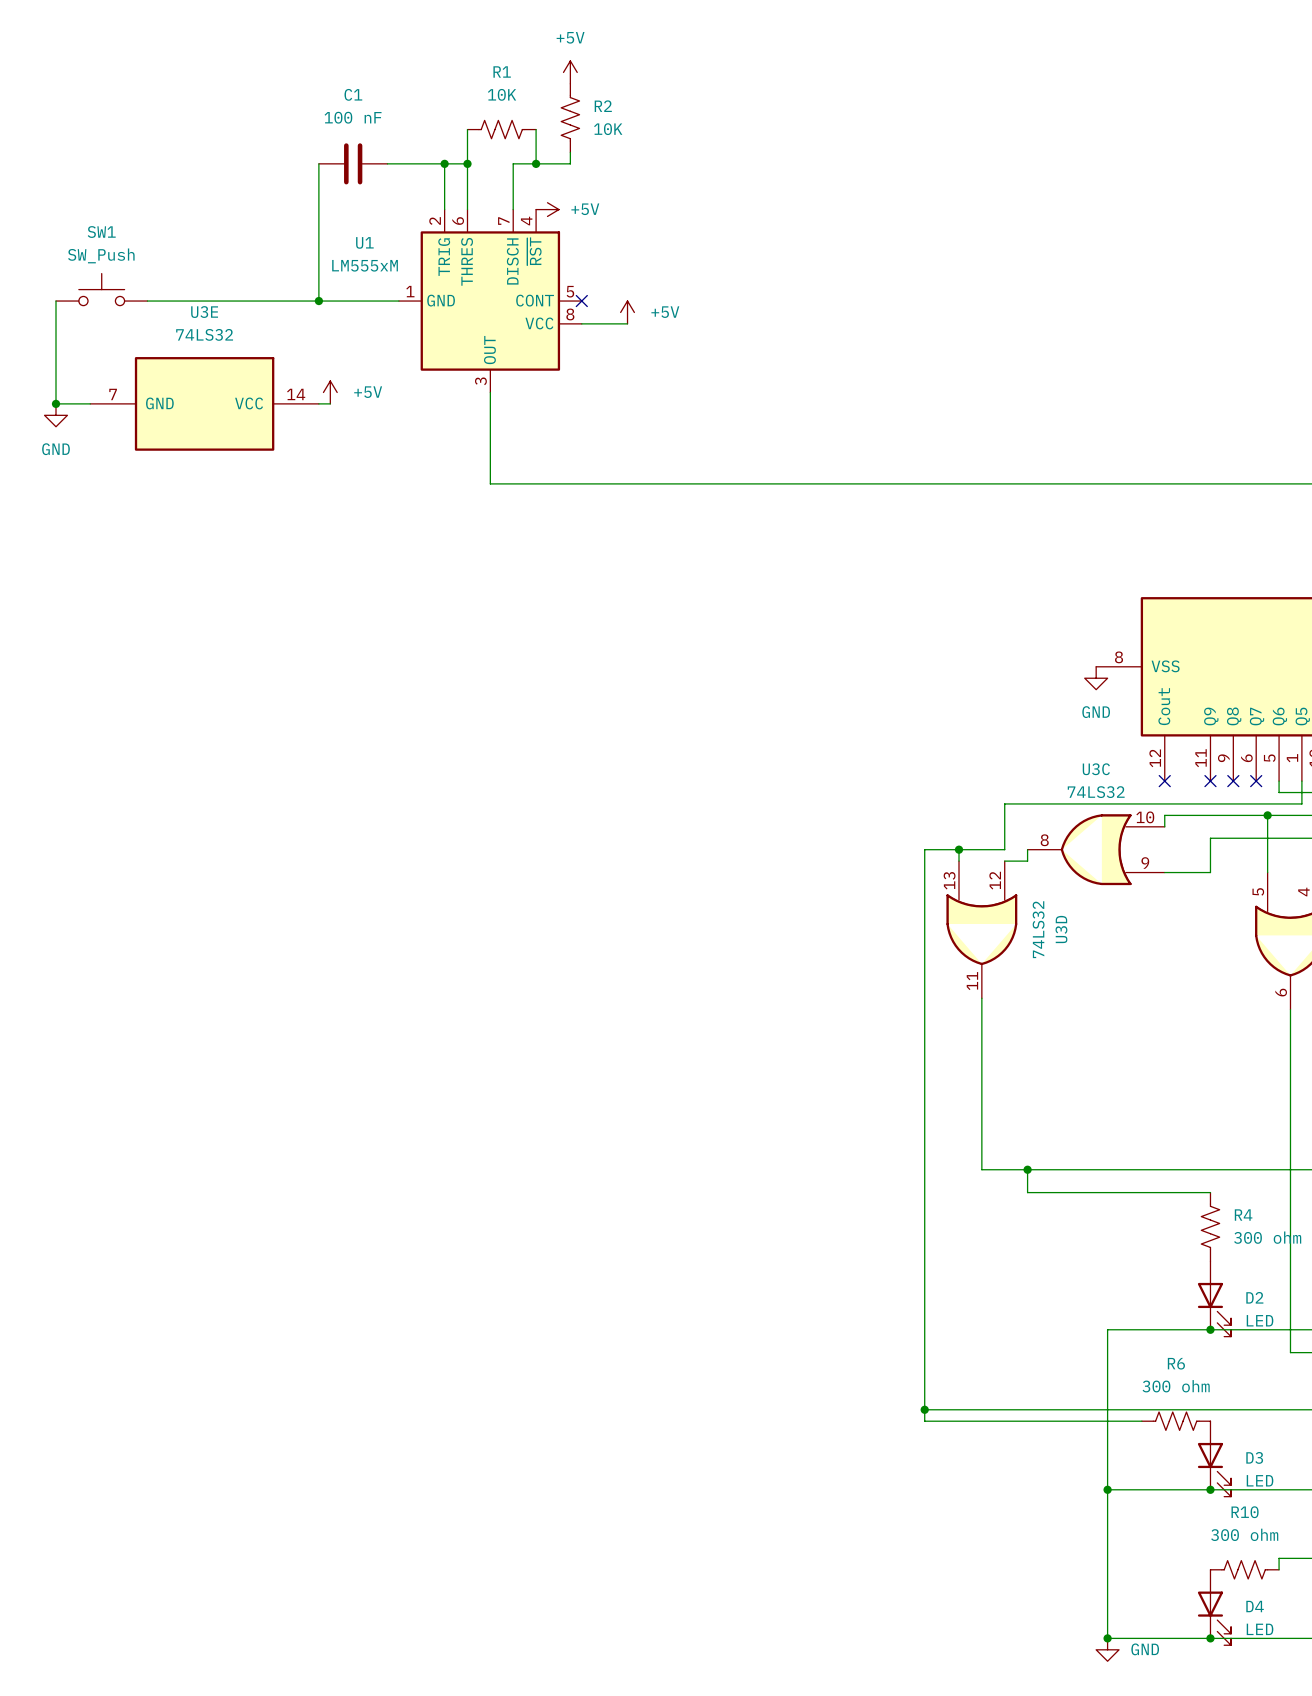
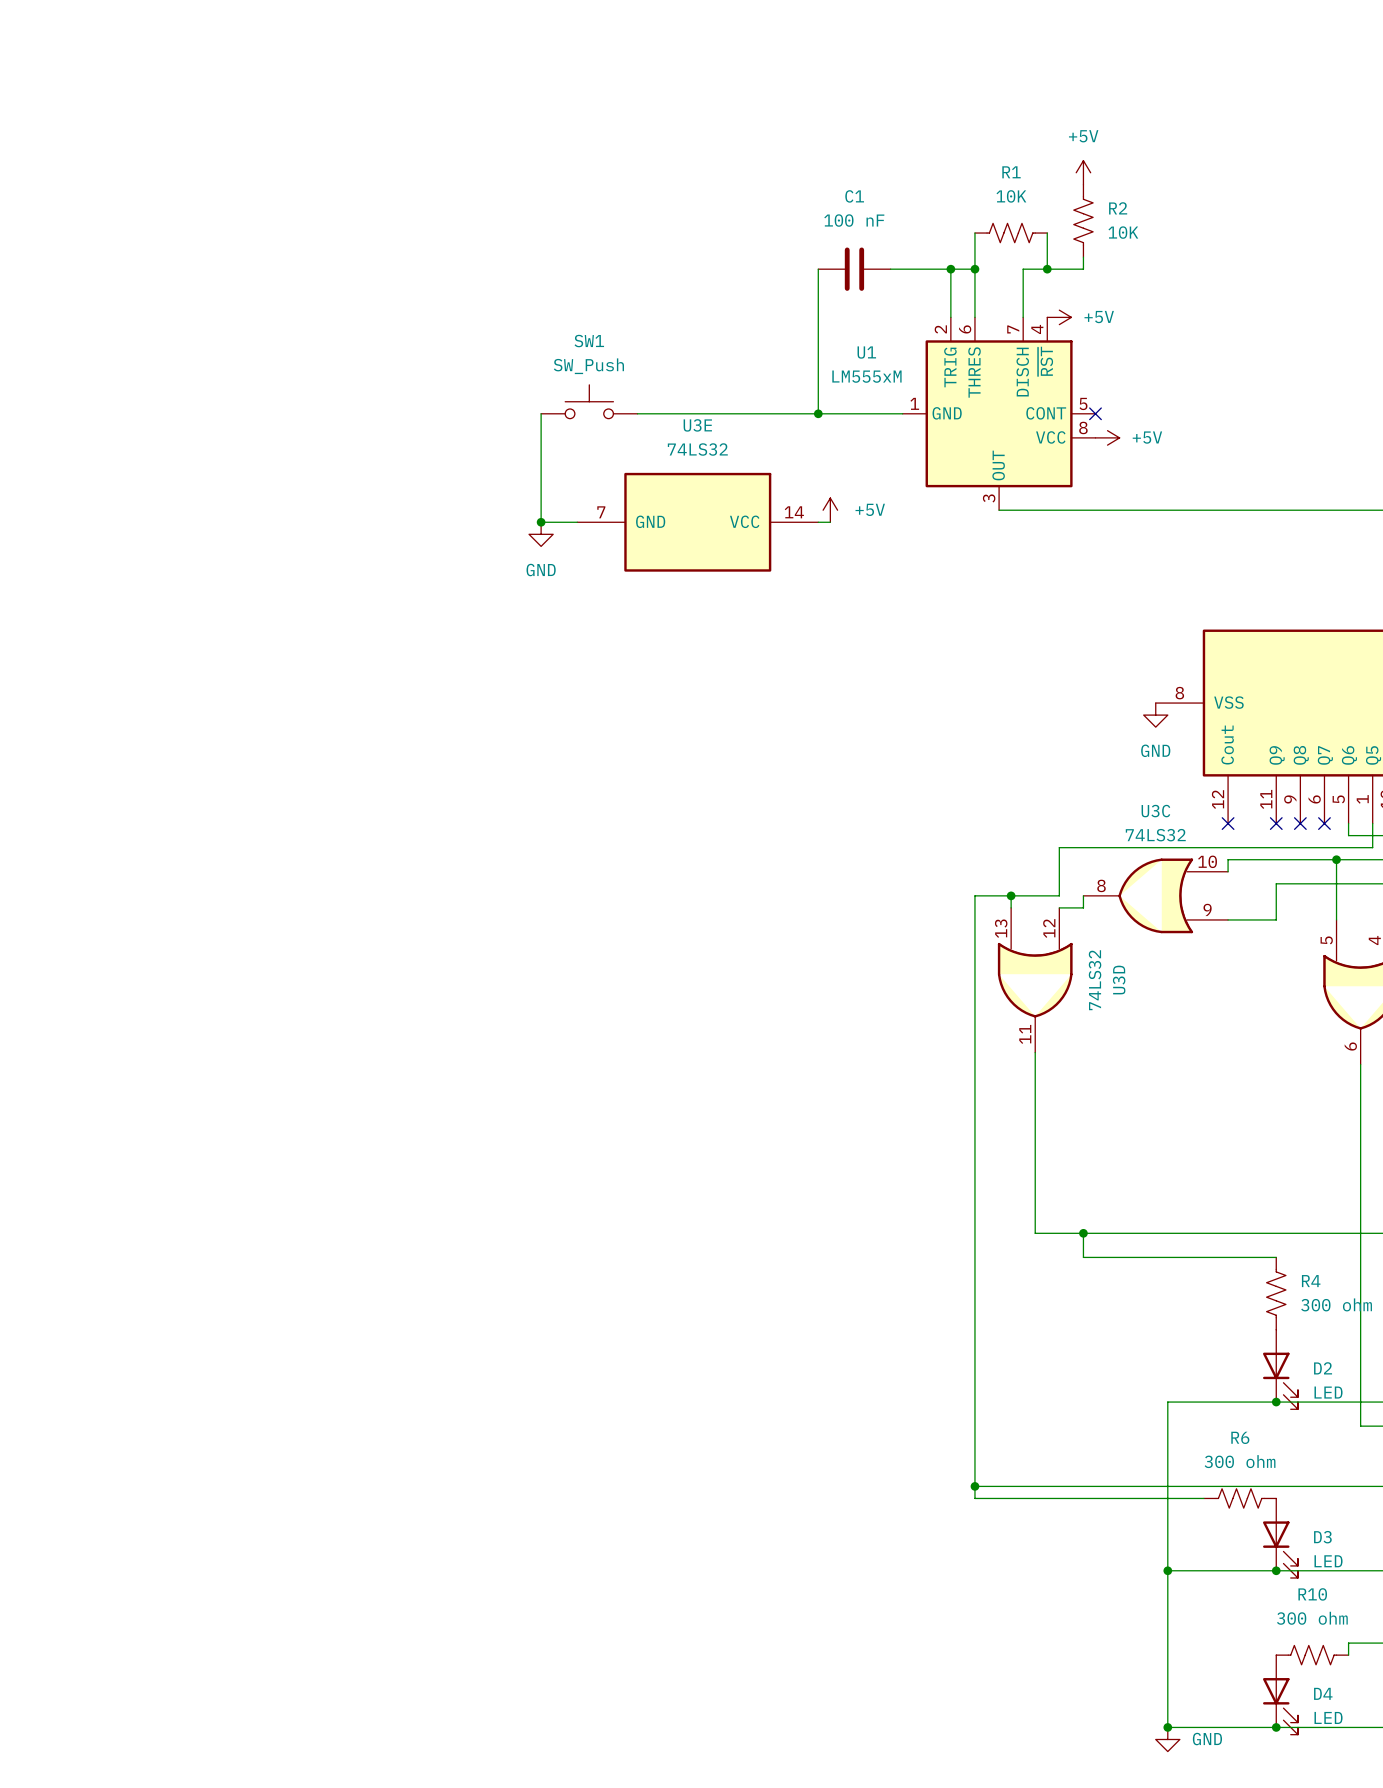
power symbol: +5V (570, 72) -> none
R2 position: (570, 118) -> (1083, 220)
wire: (467, 129) (467, 209) -> none
R1 position: (501, 129) -> (1011, 233)
wire: (536, 129) (536, 163) -> none
wire: (570, 152) (570, 163) (513, 163) (513, 209) -> none
wire: (318, 163) (318, 301) -> none
C1 position: (353, 163) -> (854, 269)
wire: (387, 163) (467, 163) -> none
wire: (444, 163) (444, 209) -> none
junction: (444, 163) -> none
junction: (467, 163) -> none
junction: (536, 163) -> none
power symbol: none -> +5V (1083, 172)
power symbol: +5V (547, 209) -> none
wire: none -> (974, 233) (974, 317)
wire: none -> (1047, 233) (1047, 269)
wire: none -> (1083, 257) (1083, 269) (1023, 269) (1023, 317)
wire: none -> (818, 269) (818, 413)
wire: none -> (890, 269) (974, 269)
wire: none -> (950, 269) (950, 317)
junction: none -> (950, 269)
junction: none -> (974, 269)
junction: none -> (1047, 269)
SW1 position: (101, 289) -> (589, 401)
wire: (56, 301) (56, 403) (90, 403) -> none
wire: (147, 301) (398, 301) -> none
junction: (318, 301) -> none
U1 position: (490, 301) -> (999, 413)
no-connect mark: (581, 301) -> none
power symbol: none -> +5V (1059, 317)
power symbol: +5V (627, 312) -> none
wire: (581, 323) (627, 323) -> none
power symbol: +5V (330, 392) -> none
wire: (490, 392) (490, 483) (947, 483) -> none
wire: none -> (541, 413) (541, 522) (577, 522)
wire: none -> (637, 413) (902, 413)
junction: none -> (818, 413)
no-connect mark: none -> (1095, 413)
junction: (56, 403) -> none
U3E position: (204, 403) -> (697, 522)
wire: (318, 403) (330, 403) -> none
power symbol: GND (56, 415) -> none
power symbol: none -> +5V (1107, 437)
power symbol: none -> +5V (830, 510)
junction: none -> (541, 522)
wire: none -> (818, 522) (830, 522)
power symbol: none -> GND (541, 534)

